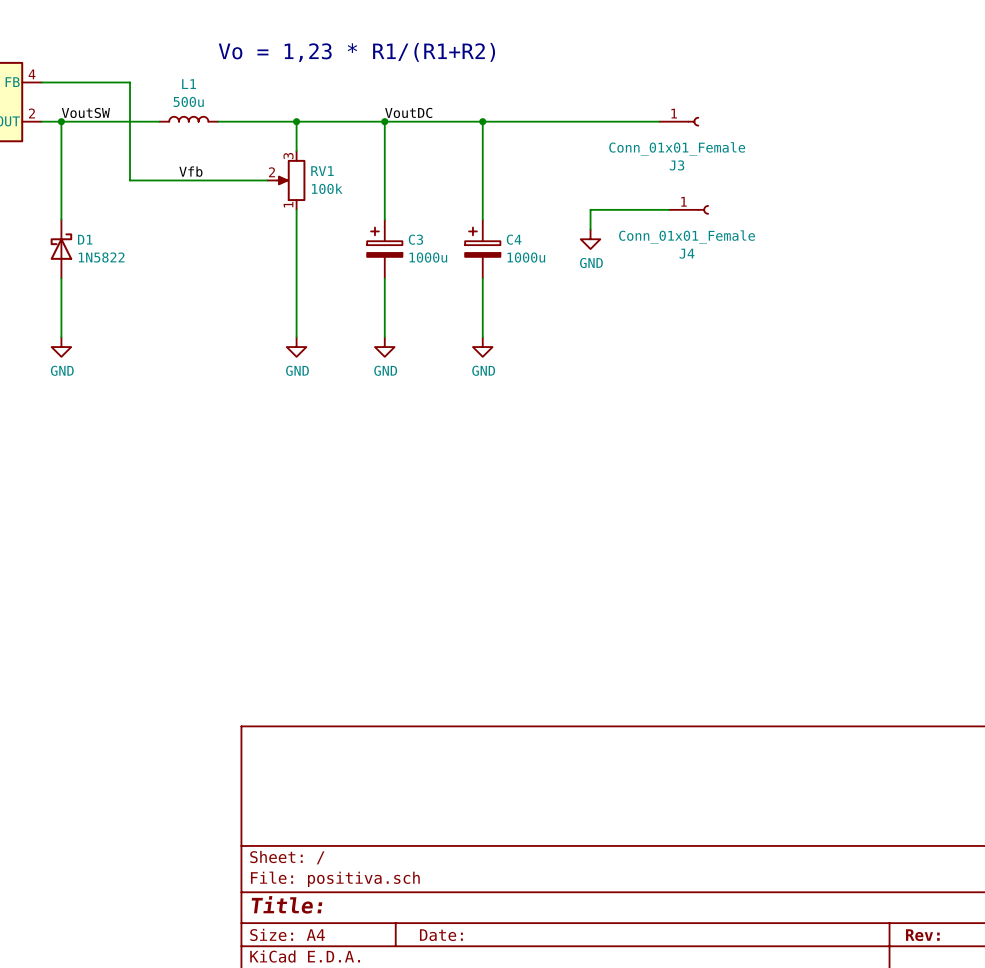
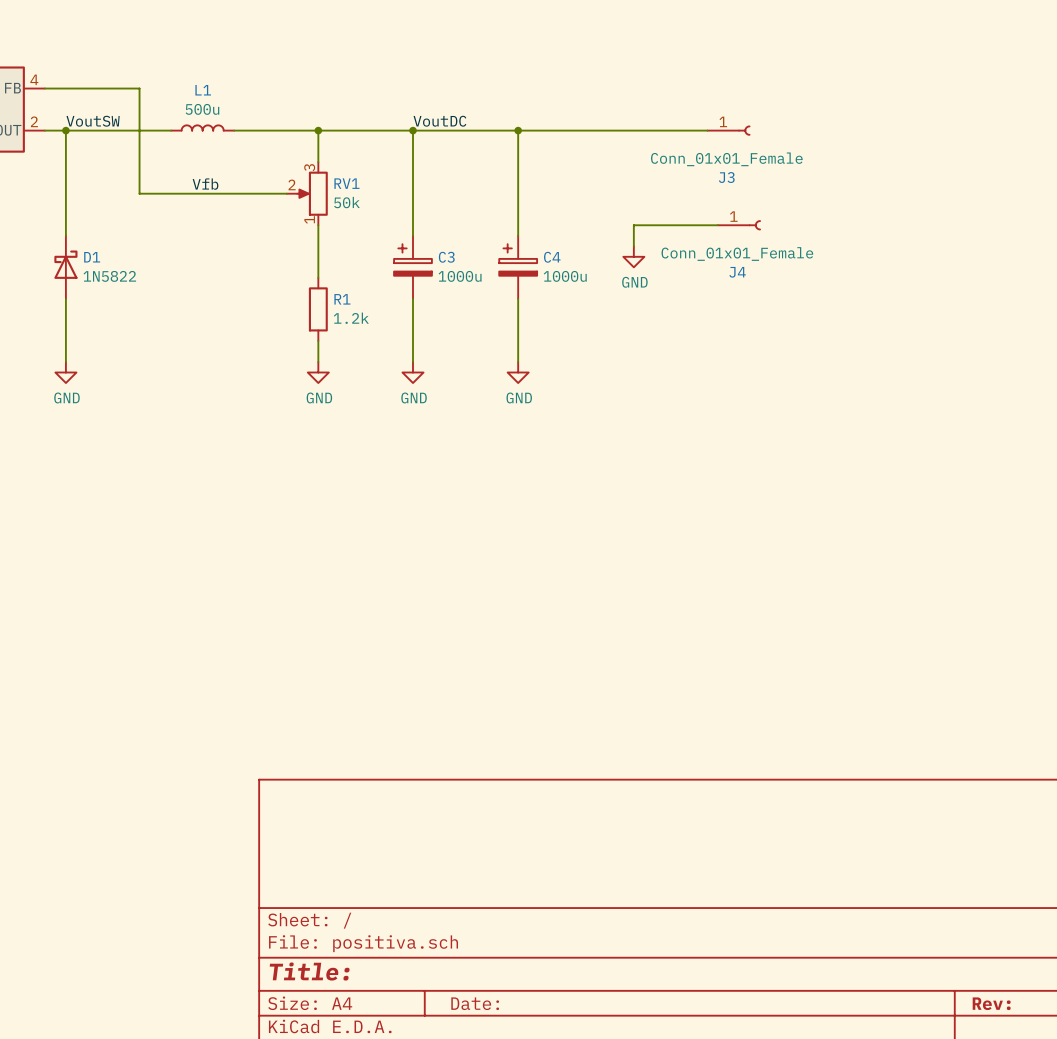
text: Vo = 1,23 * R1/(R1+R2) (356, 52) -> none
RV1 value: 100k (327, 188) -> 50k (346, 202)
wire: (296, 258) (296, 317) -> none
R1: none -> 1.2k (318, 309)

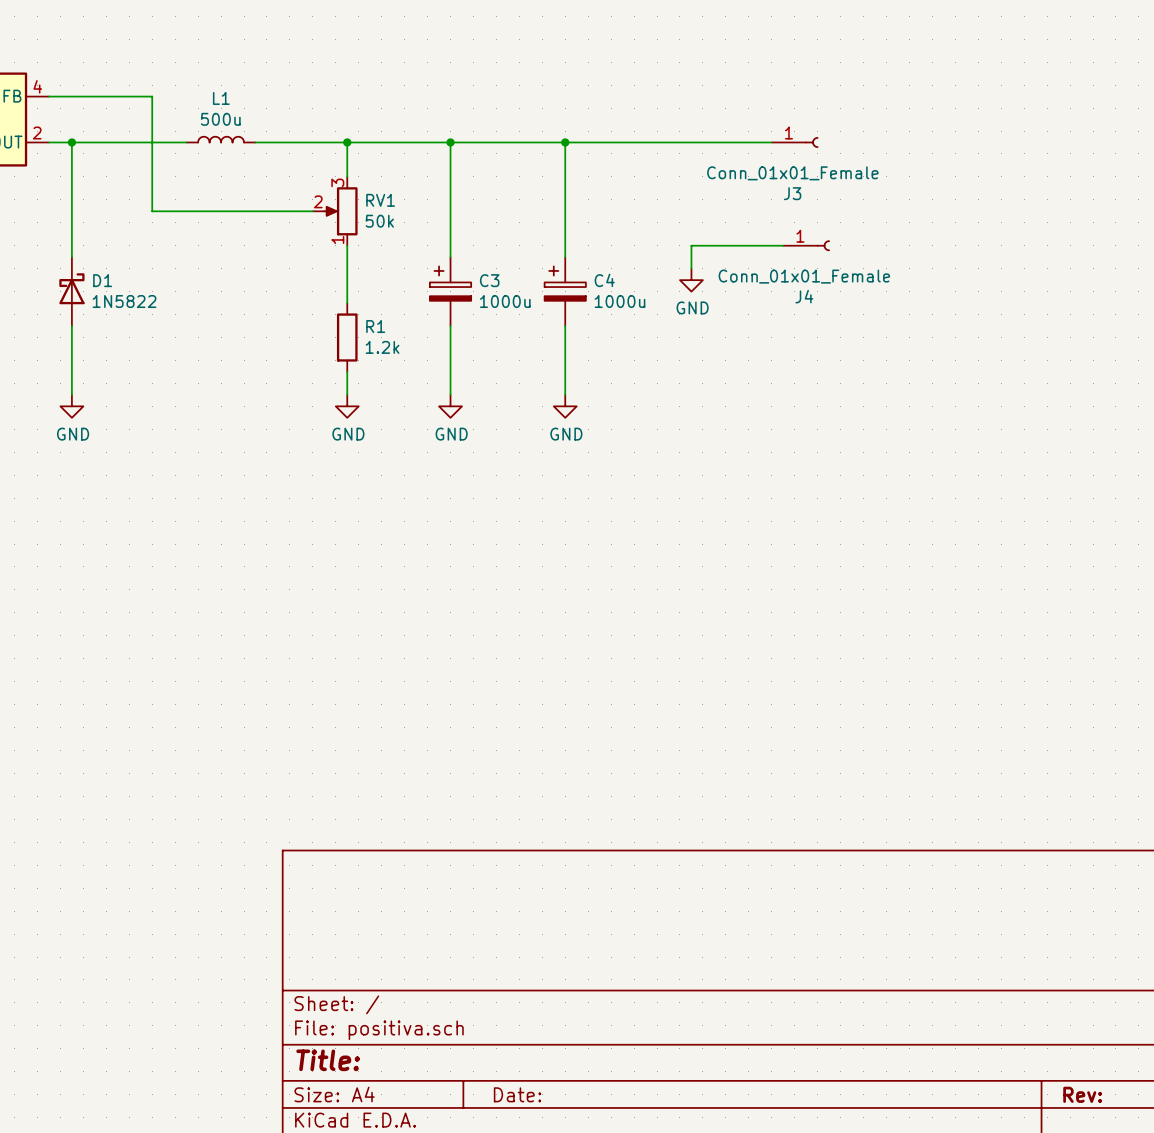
label: VoutSW (93, 121) -> none
label: VoutDC (439, 121) -> none
label: Vfb (205, 184) -> none

